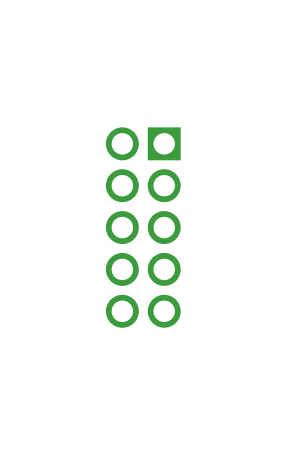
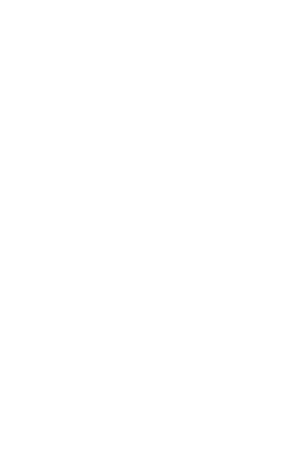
part: (143, 227) -> none

